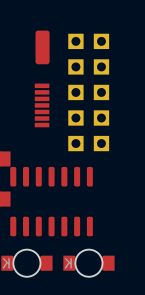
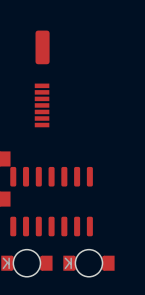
part: (88, 92) -> none

